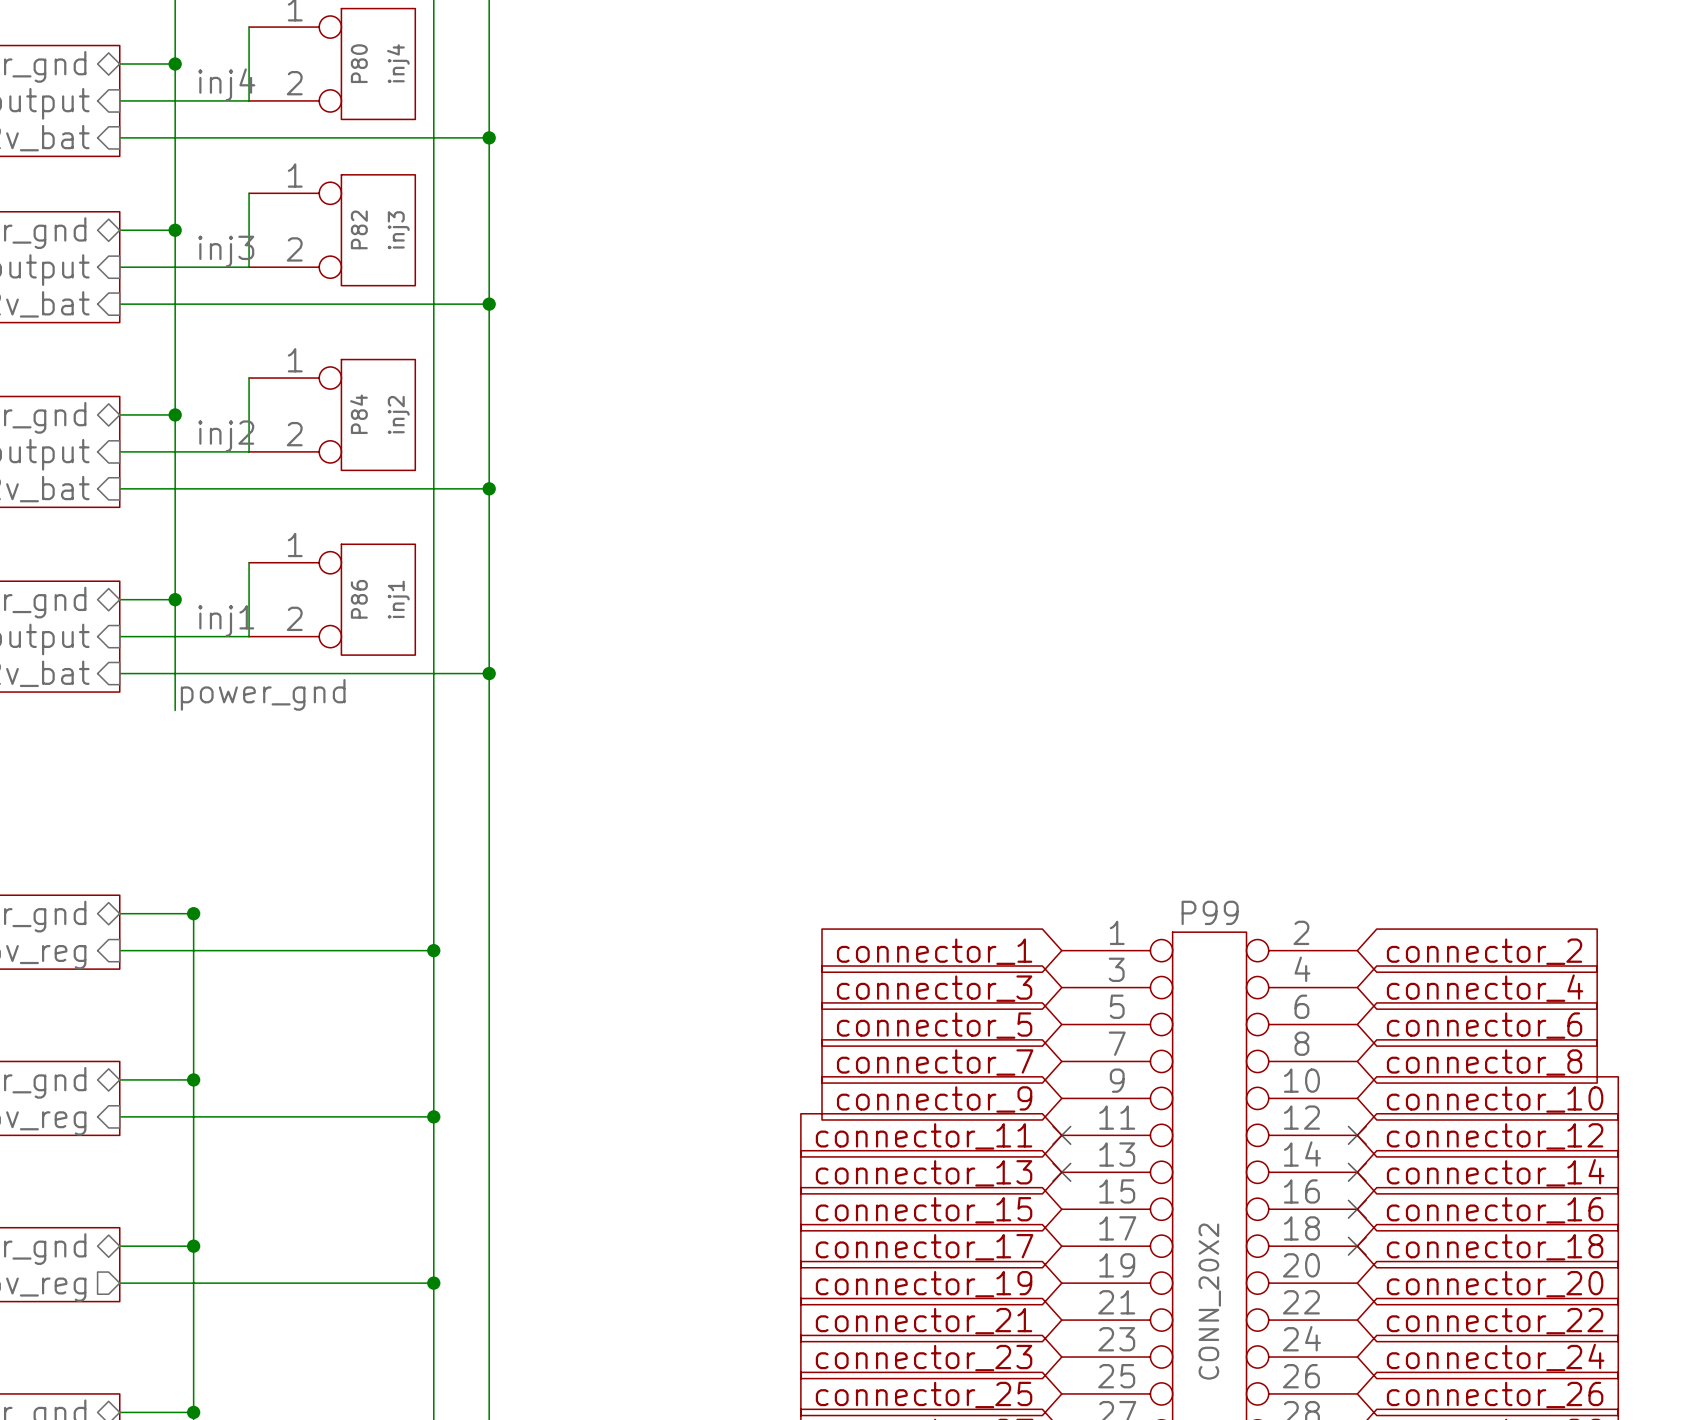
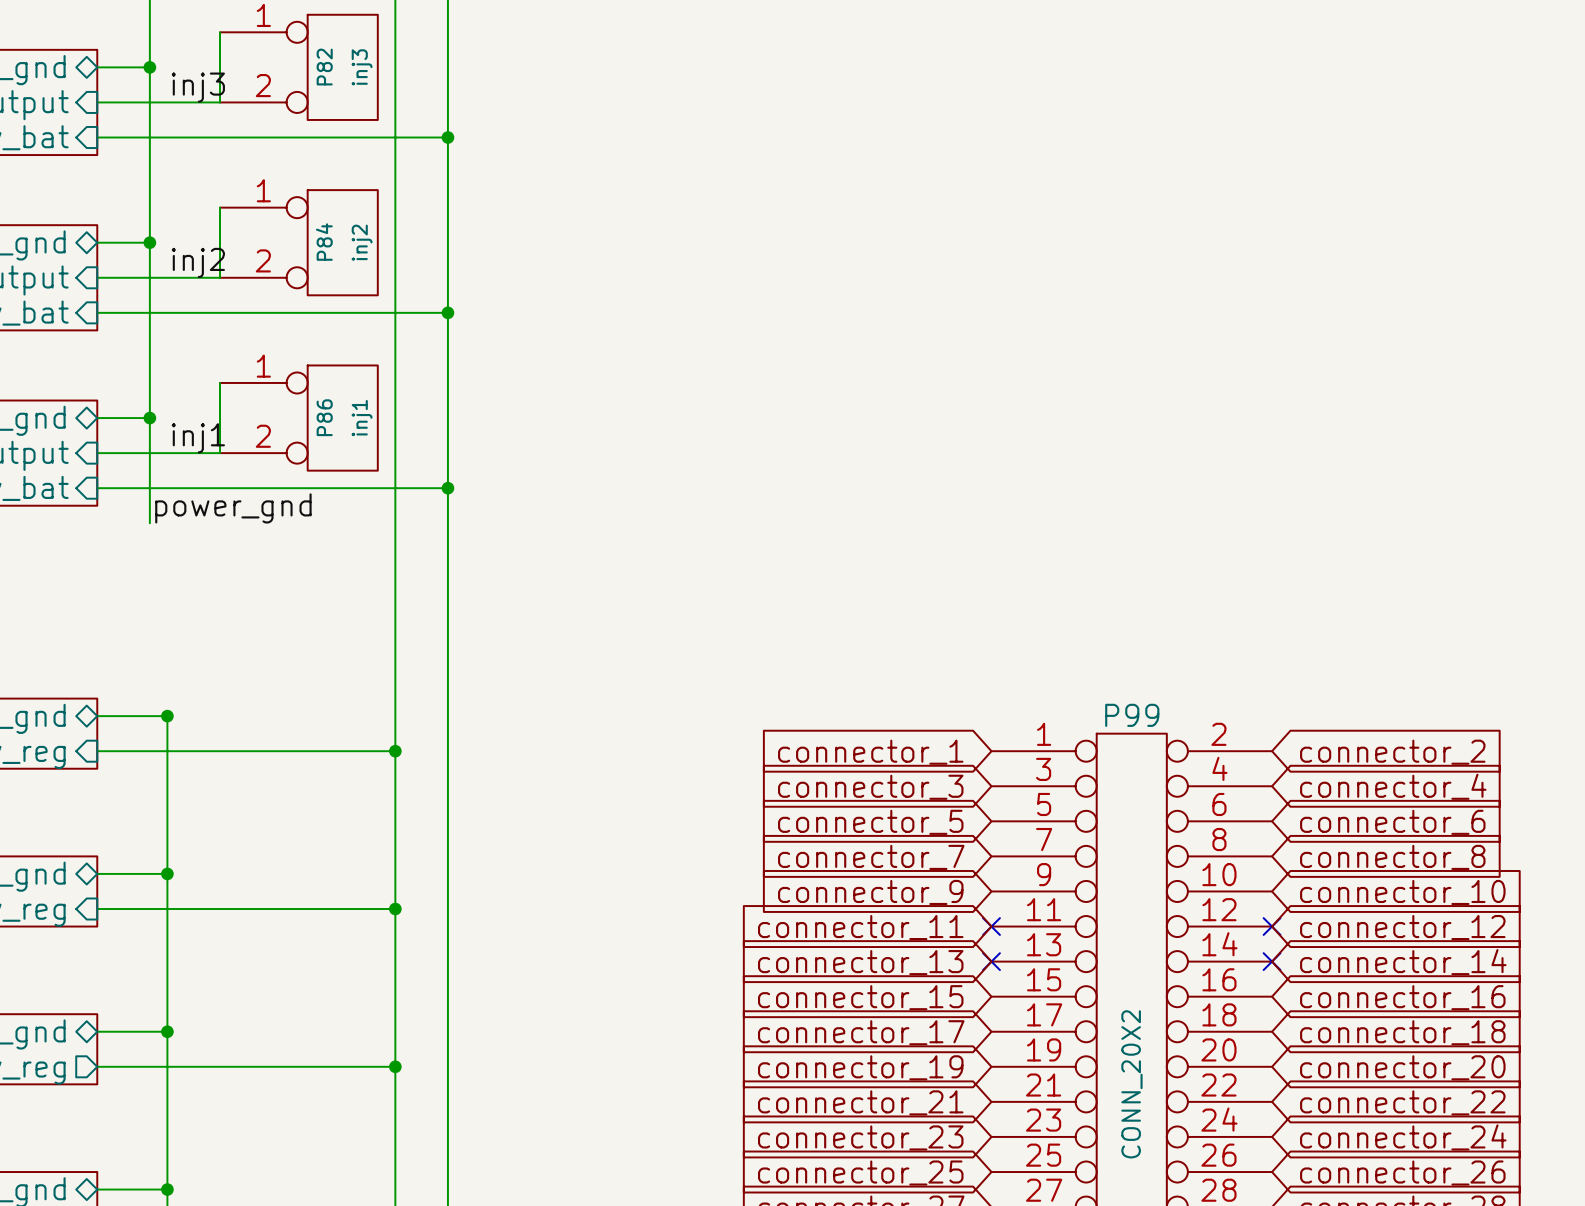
no-connect mark: (1357, 1209) -> none
no-connect mark: (1357, 1246) -> none

